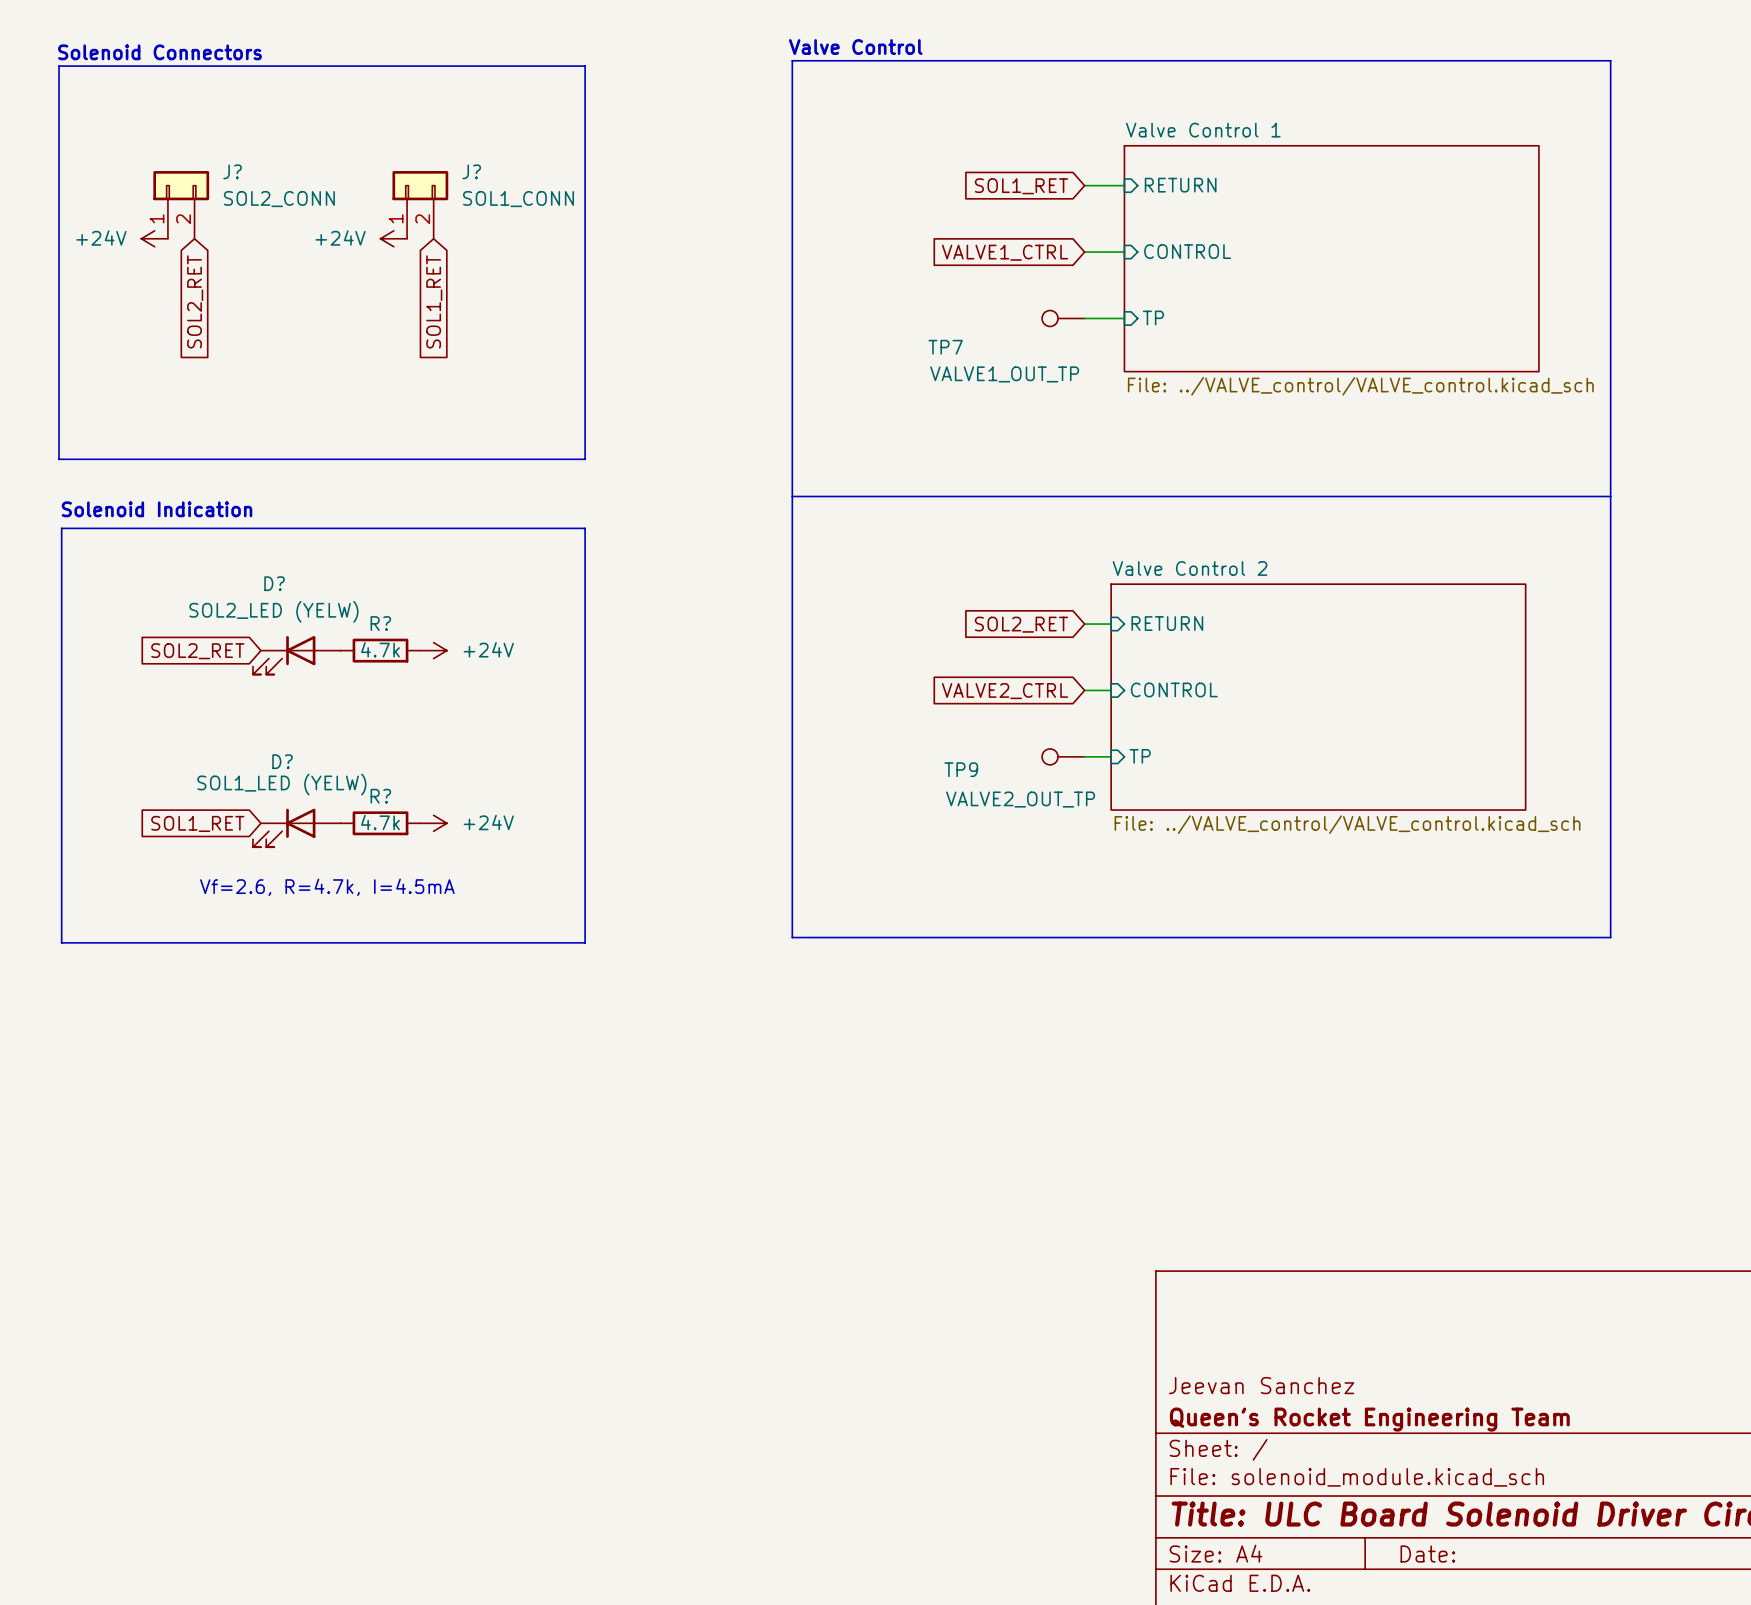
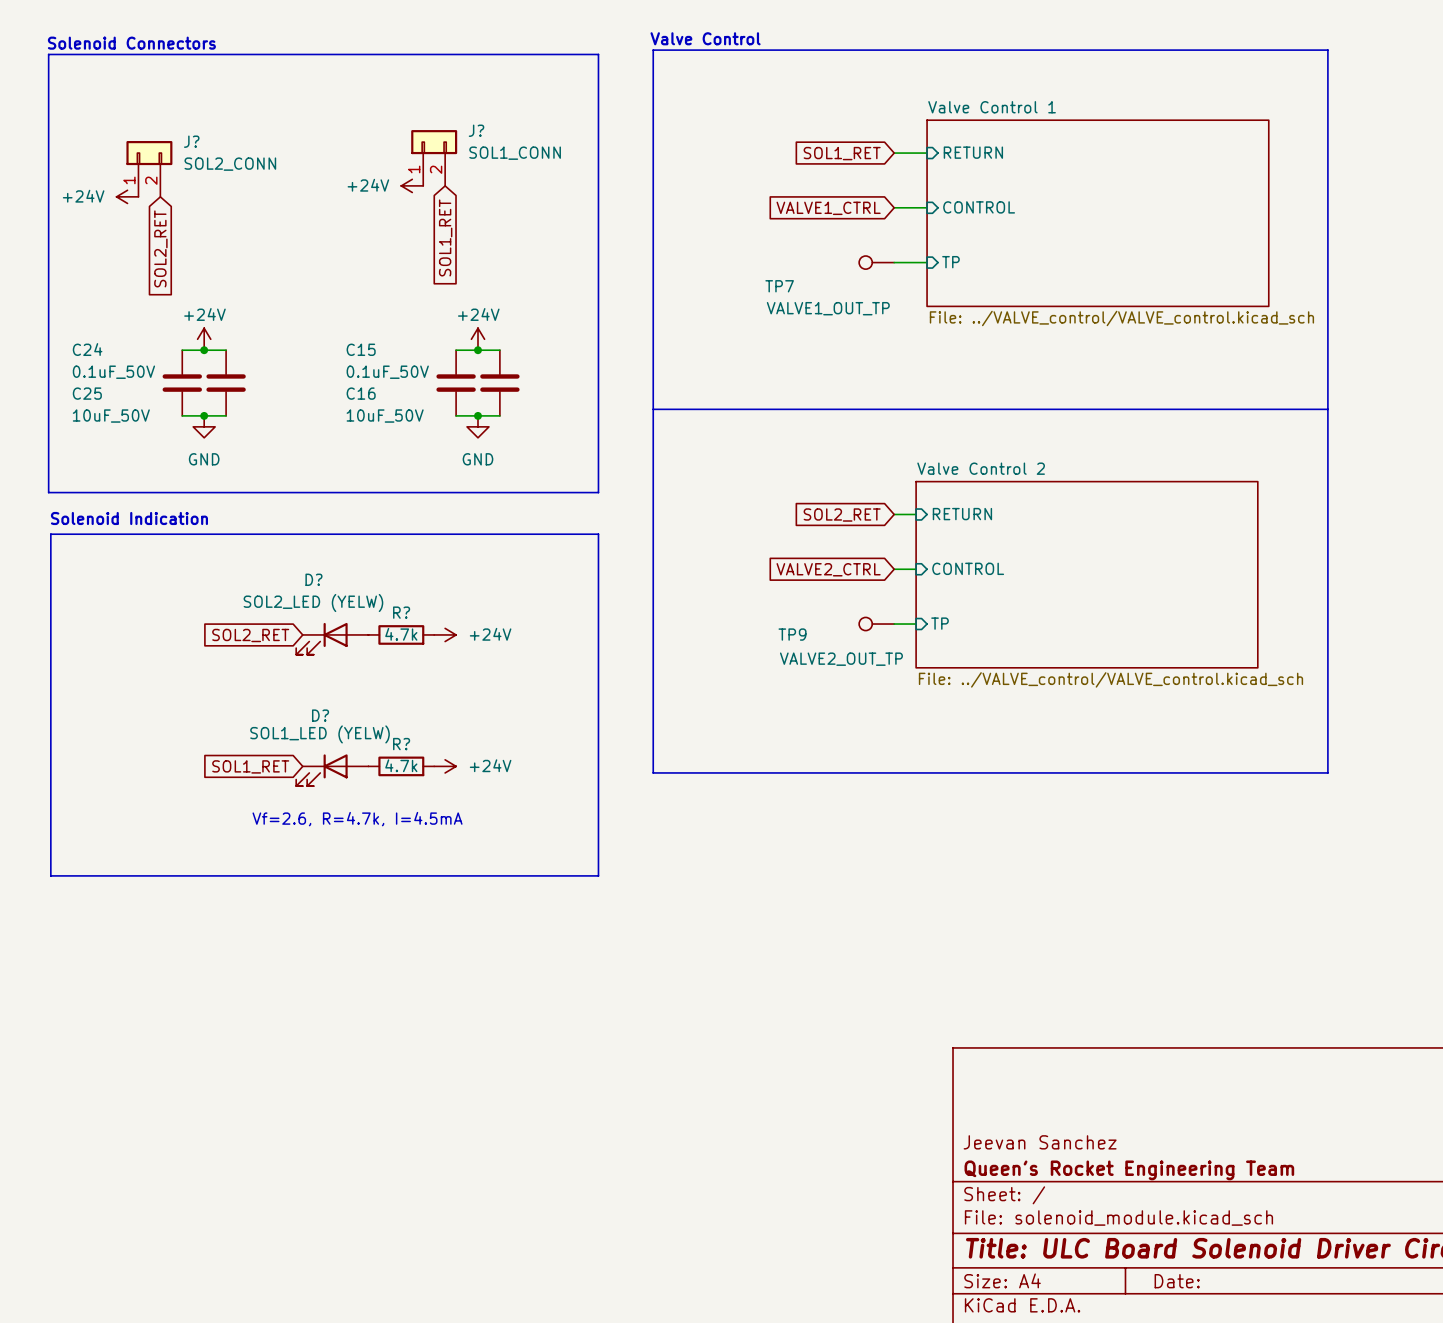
line: (585, 66) (585, 459) (59, 459) -> (482, 54) (598, 54) (598, 492) (48, 492) (48, 378)
J? position: (420, 204) -> (434, 157)
power symbol position: +24V (393, 238) -> +24V (412, 185)
global label position: SOL1_RET (434, 301) -> SOL1_RET (445, 237)
power symbol: none -> +24V (204, 339)
power symbol: none -> +24V (477, 339)
wire: none -> (182, 350) (226, 350)
junction: none -> (204, 350)
wire: none -> (456, 350) (499, 350)
junction: none -> (477, 350)
C24: none -> 0.1uF_50V (182, 383)
C25: none -> 10uF_50V (226, 383)
C15: none -> 0.1uF_50V (456, 383)
C16: none -> 10uF_50V (499, 383)
wire: none -> (182, 415) (226, 415)
junction: none -> (204, 415)
wire: none -> (456, 415) (499, 415)
junction: none -> (477, 415)
text position: Solenoid Indication (157, 509) -> Solenoid Indication (129, 518)
power symbol: none -> GND (204, 426)
power symbol: none -> GND (477, 426)
line: (61, 647) (61, 528) (585, 528) (585, 942) (61, 942) -> (50, 534) (598, 534) (598, 875) (50, 875) (50, 777)
R?: 4.7k (380, 650) -> none
power symbol: +24V (433, 650) -> none
global label position: SOL2_RET (197, 651) -> SOL2_RET (250, 635)
D? position: (296, 655) -> (332, 638)
R?: none -> 4.7k (401, 634)
power symbol: none -> +24V (445, 634)
global label position: SOL1_RET (197, 823) -> SOL1_RET (250, 766)
R?: 4.7k (380, 823) -> none
power symbol: +24V (433, 823) -> none
D? position: (296, 827) -> (332, 770)
text position: Vf=2.6, R=4.7k, I=4.5mA (327, 887) -> Vf=2.6, R=4.7k, I=4.5mA (357, 819)
R?: none -> 4.7k (401, 766)
power symbol: none -> +24V (445, 766)

